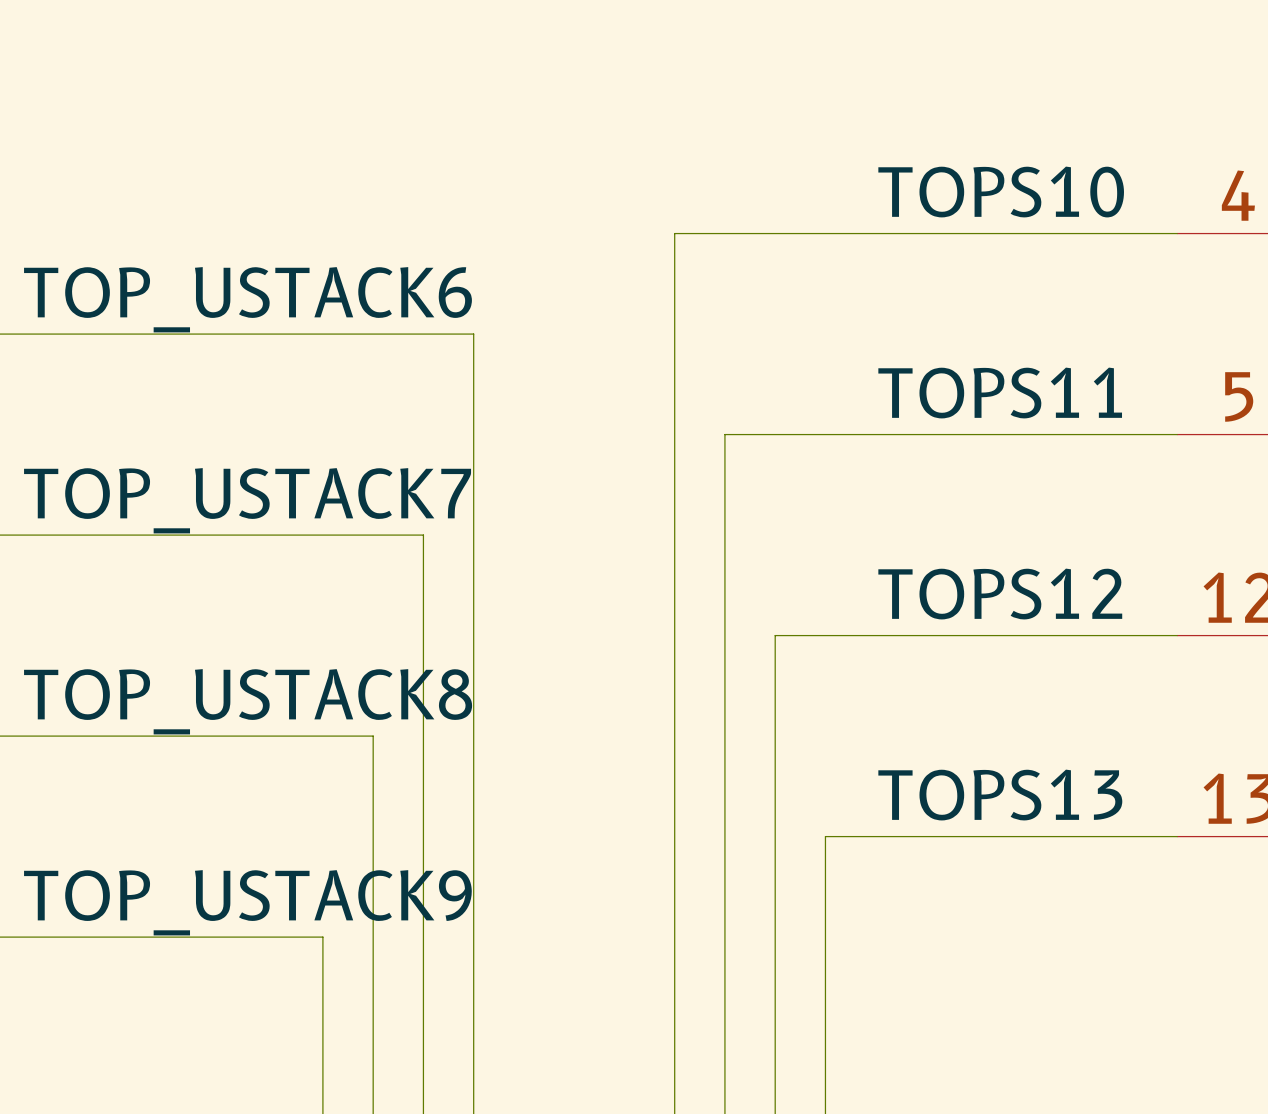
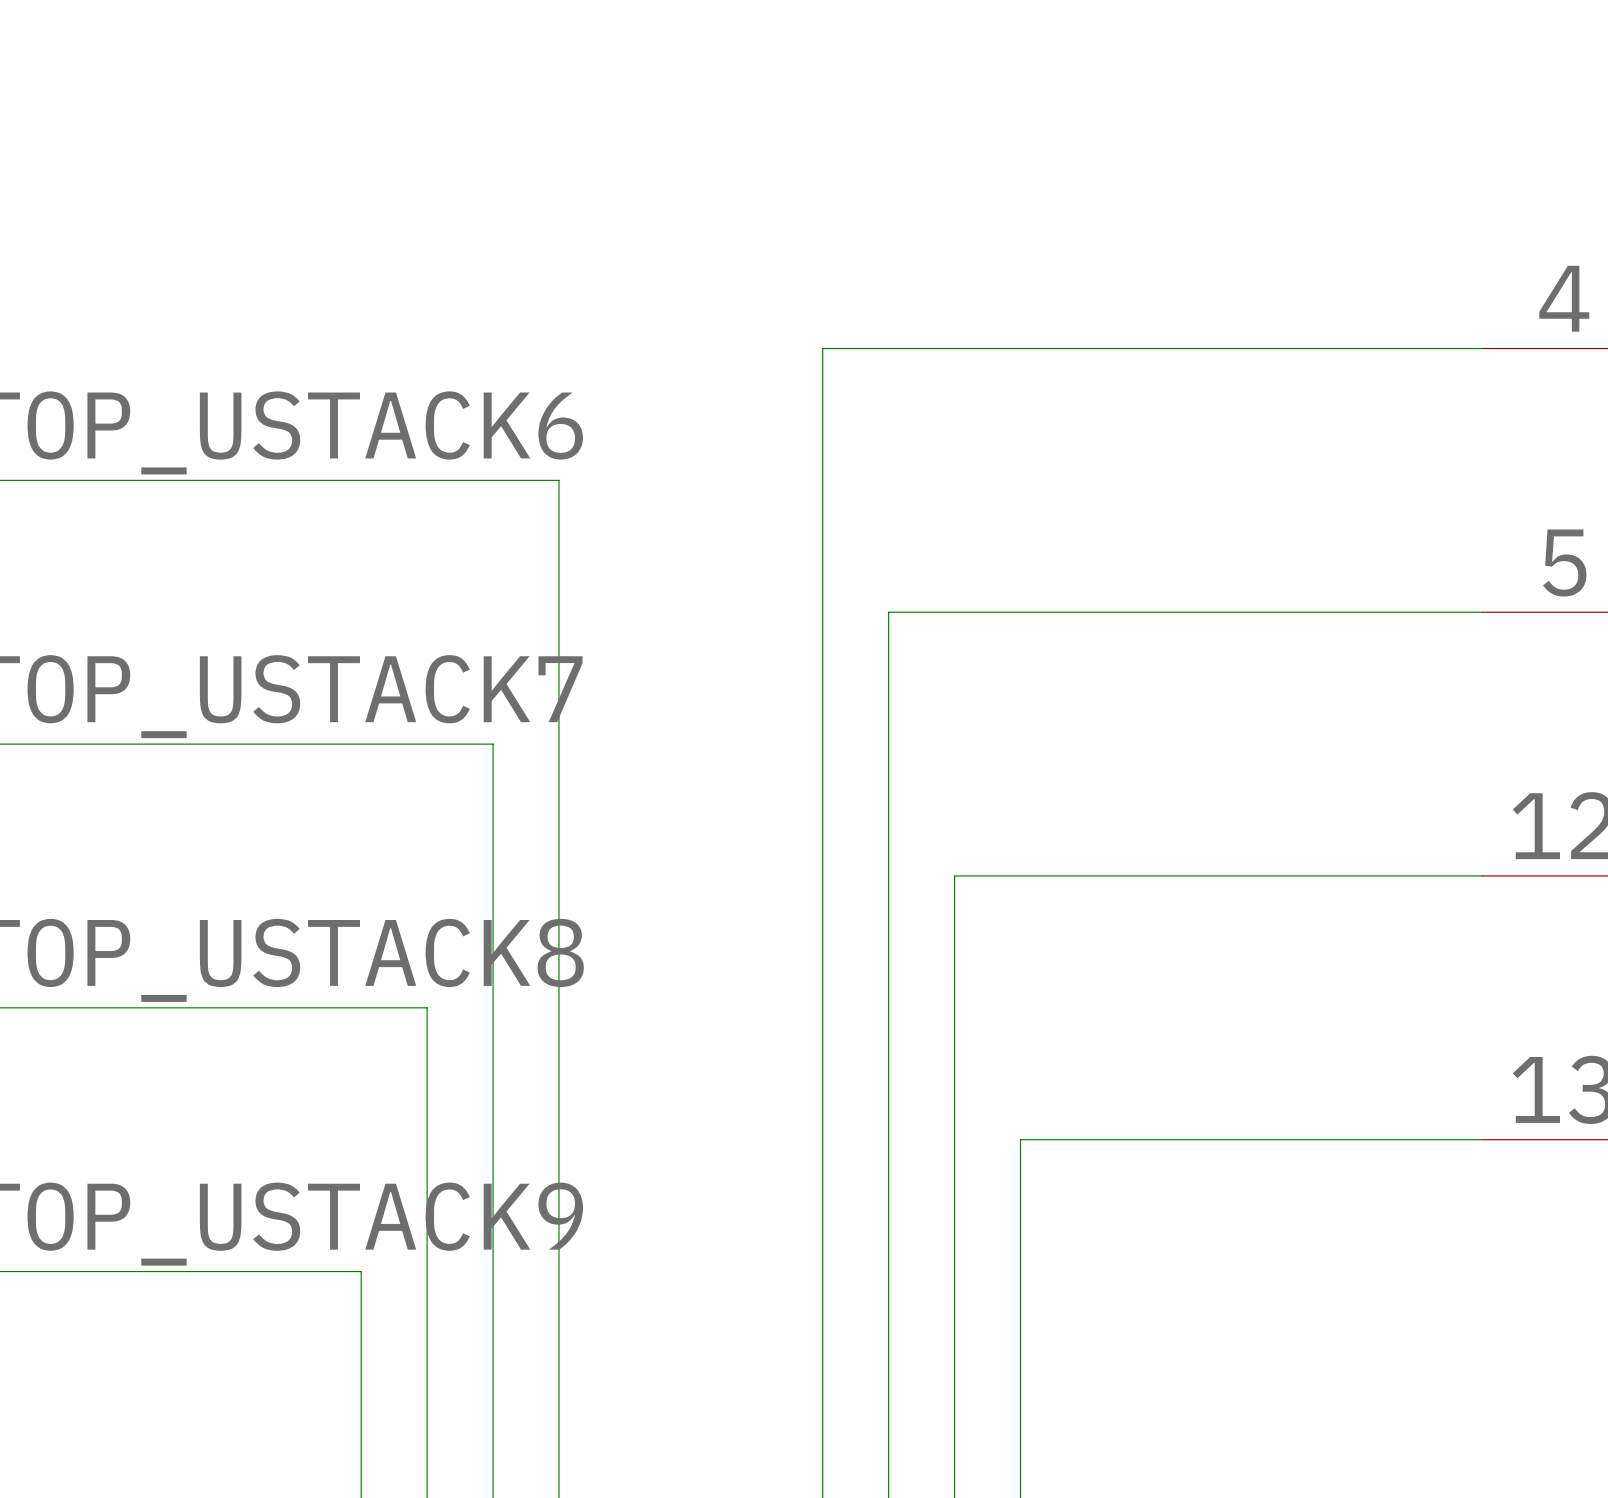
label: TOPS10 (1001, 192) -> none
label: TOPS11 (1000, 393) -> none
label: TOPS12 (1000, 594) -> none
label: TOPS13 (1000, 795) -> none

